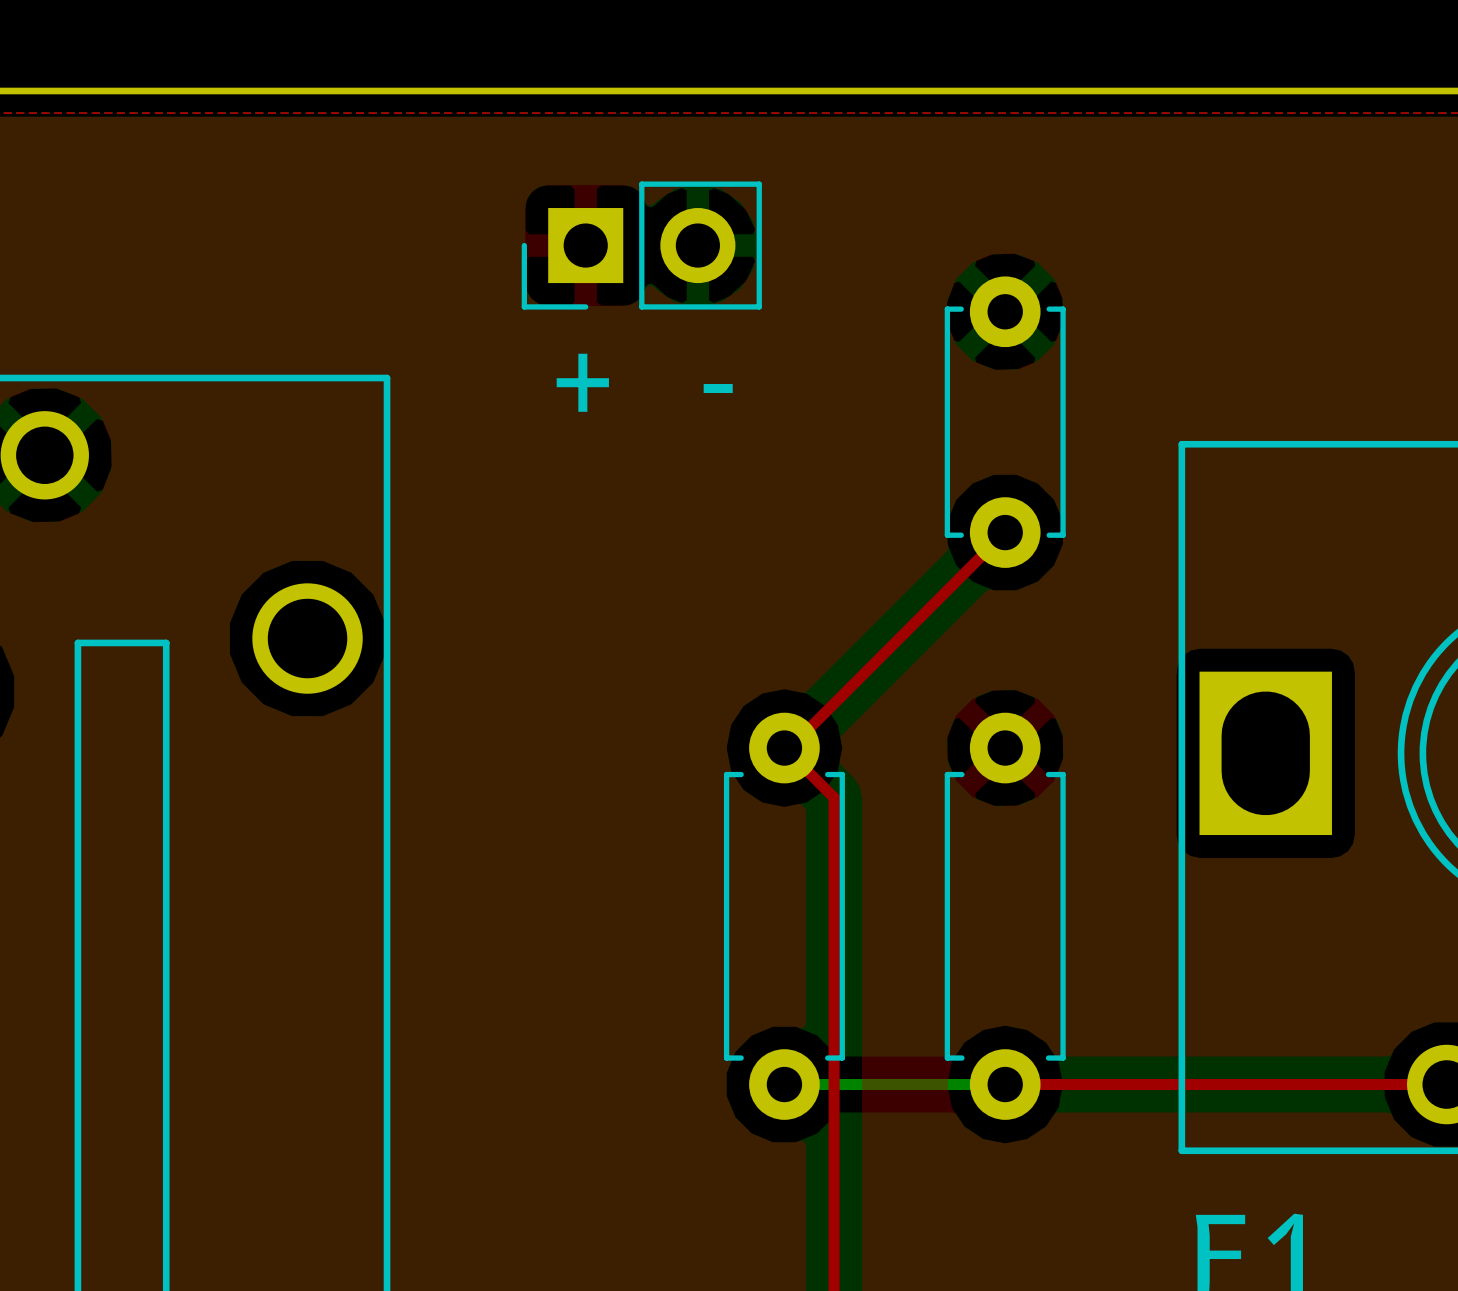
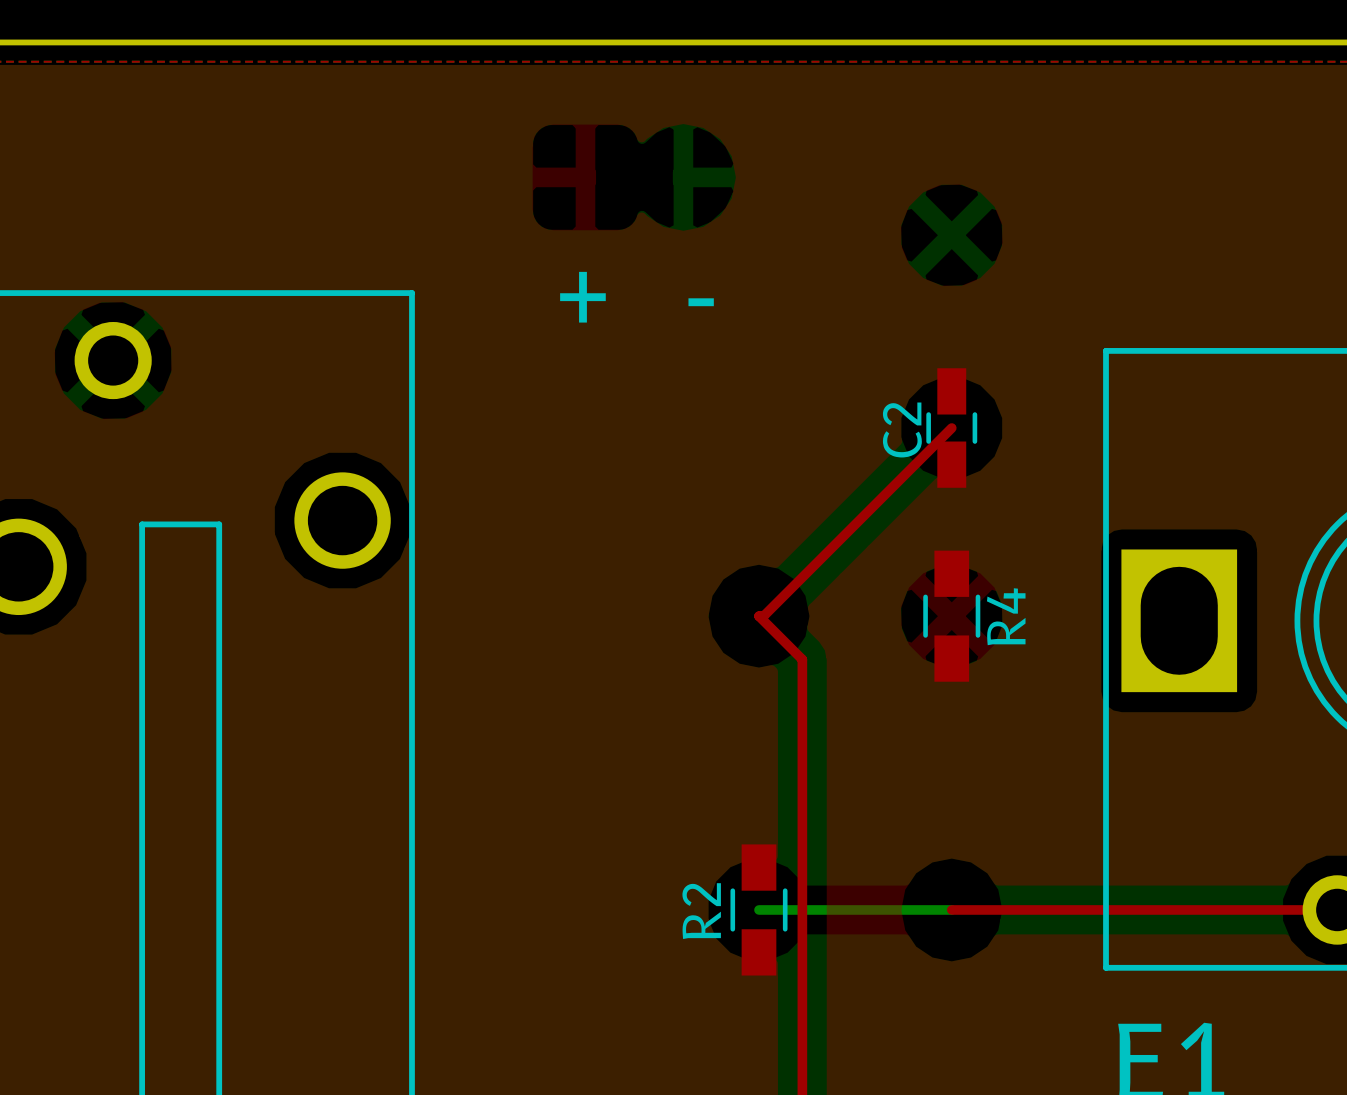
part: (641, 245) -> none
part: (1005, 422) -> none
C2: none -> (951, 428)
R4: none -> (951, 616)
part: (784, 916) -> none
part: (1005, 916) -> none
R2: none -> (758, 909)

